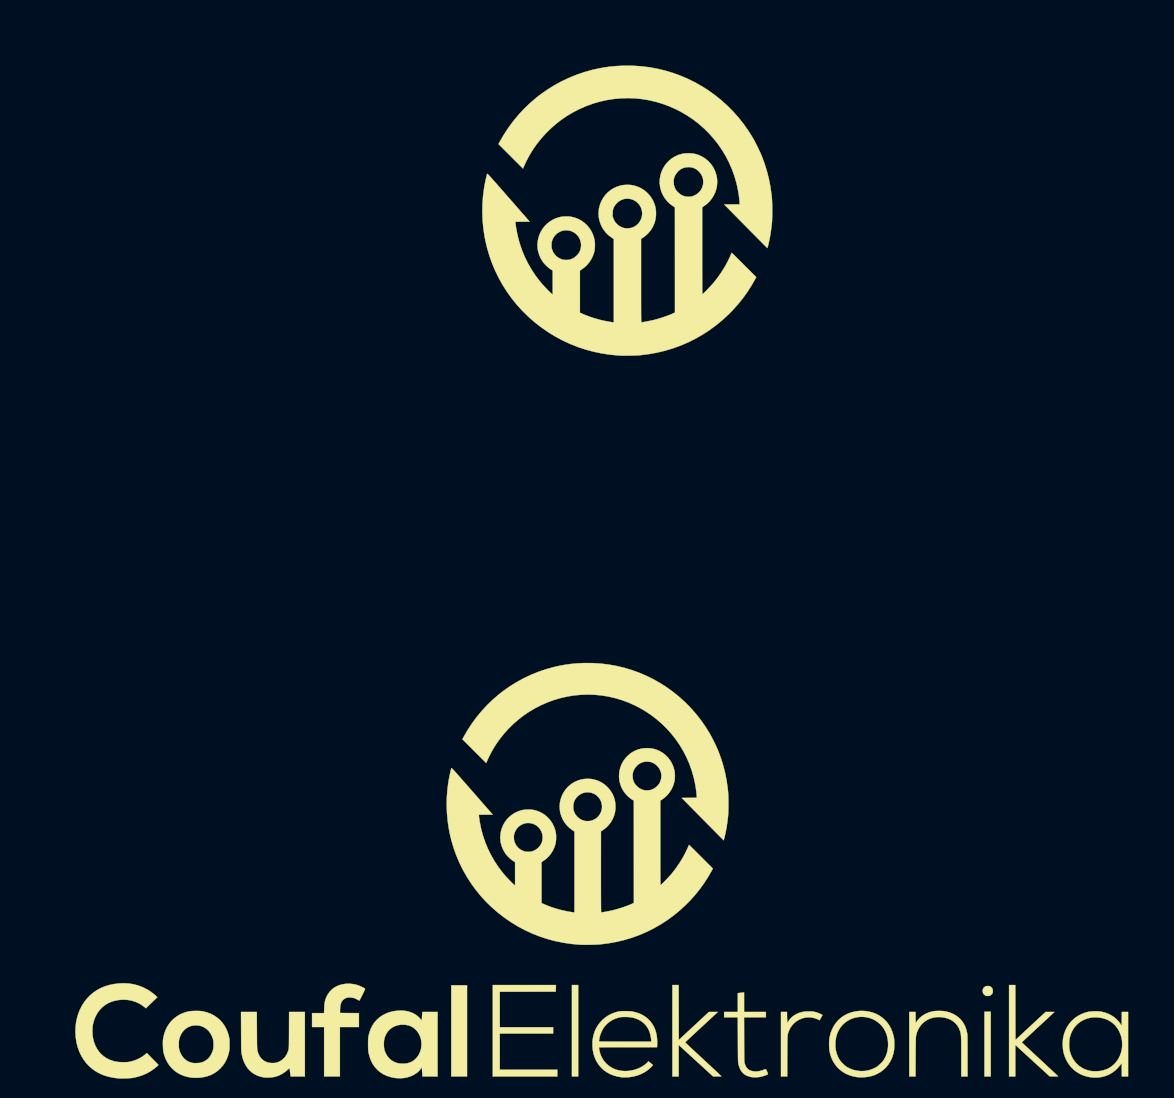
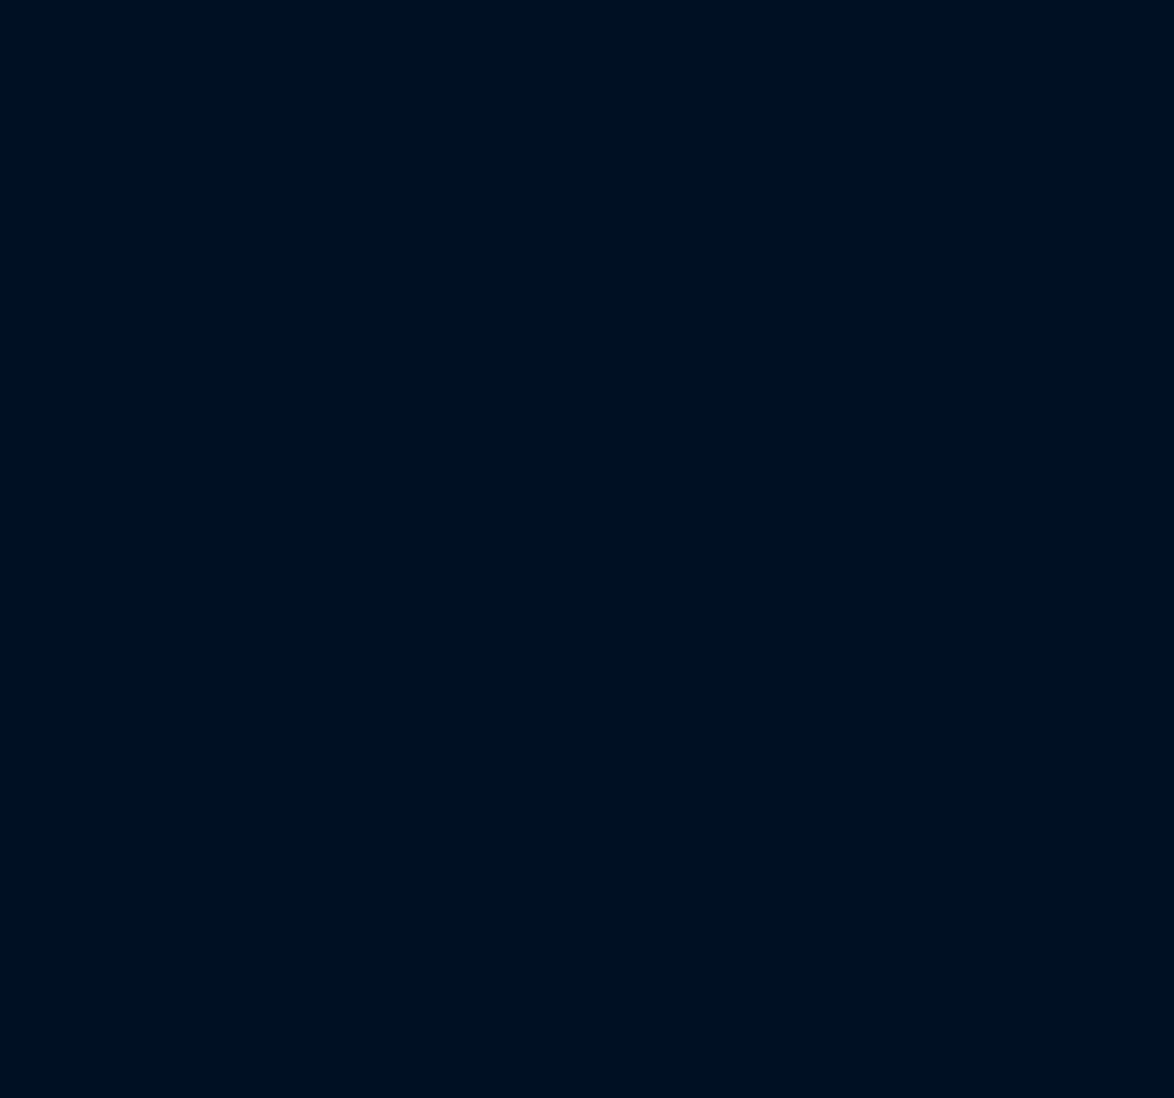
drawing: [482, 65, 773, 356] -> none
drawing: [75, 662, 1129, 1079] -> none

